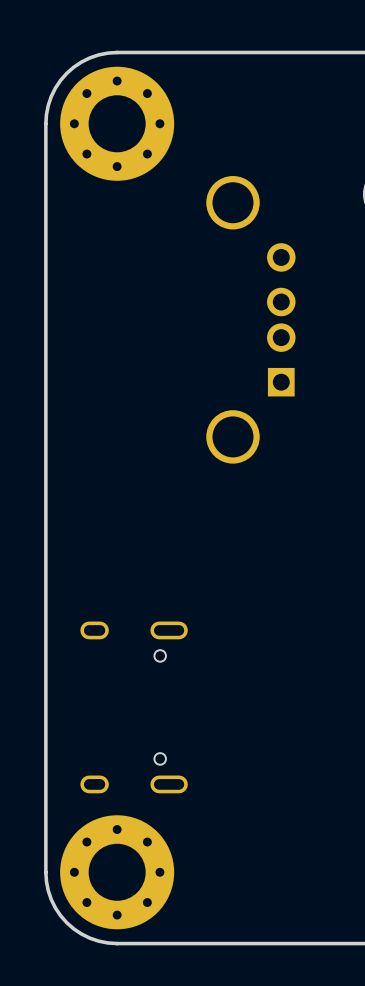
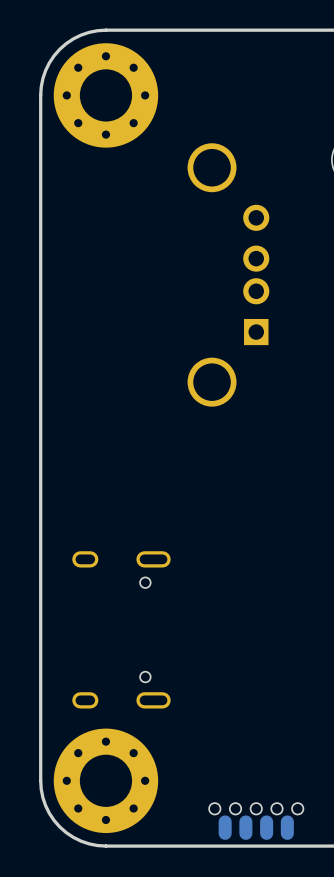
part: none -> (256, 821)

